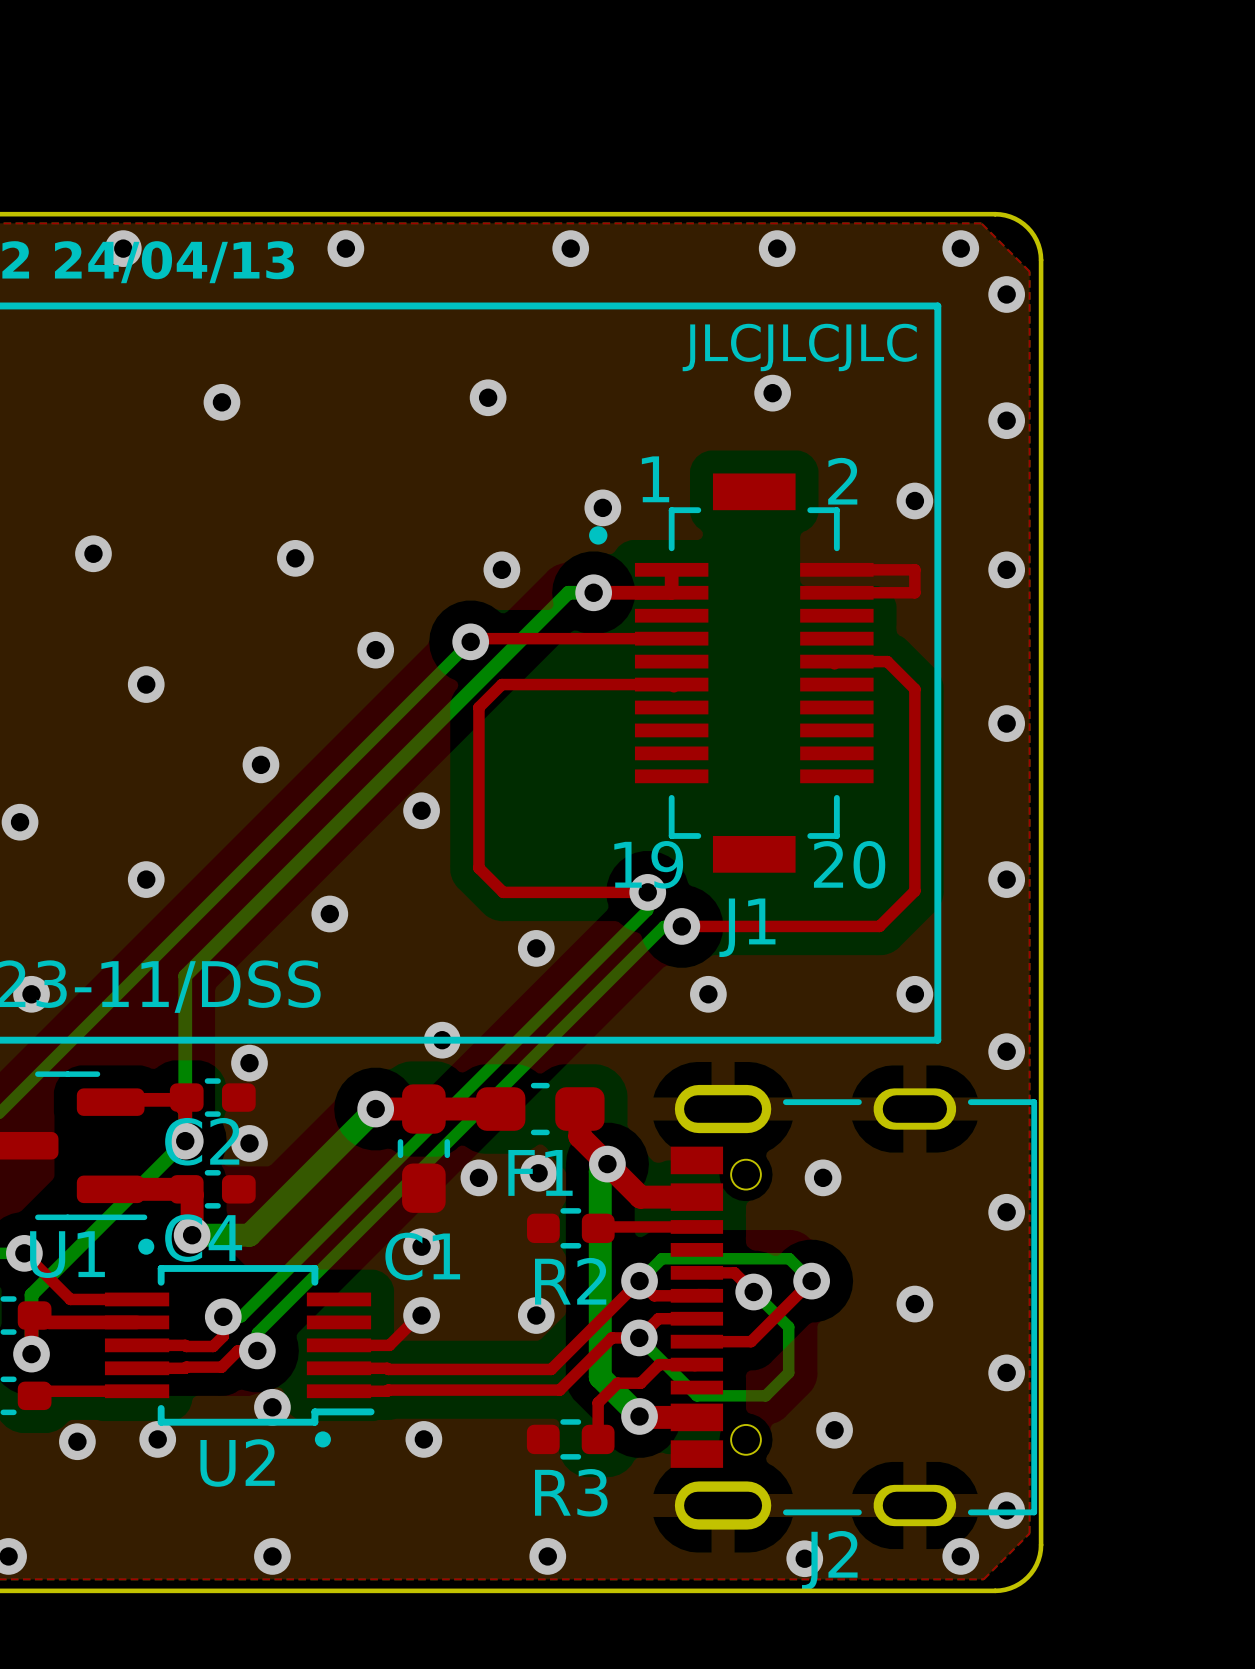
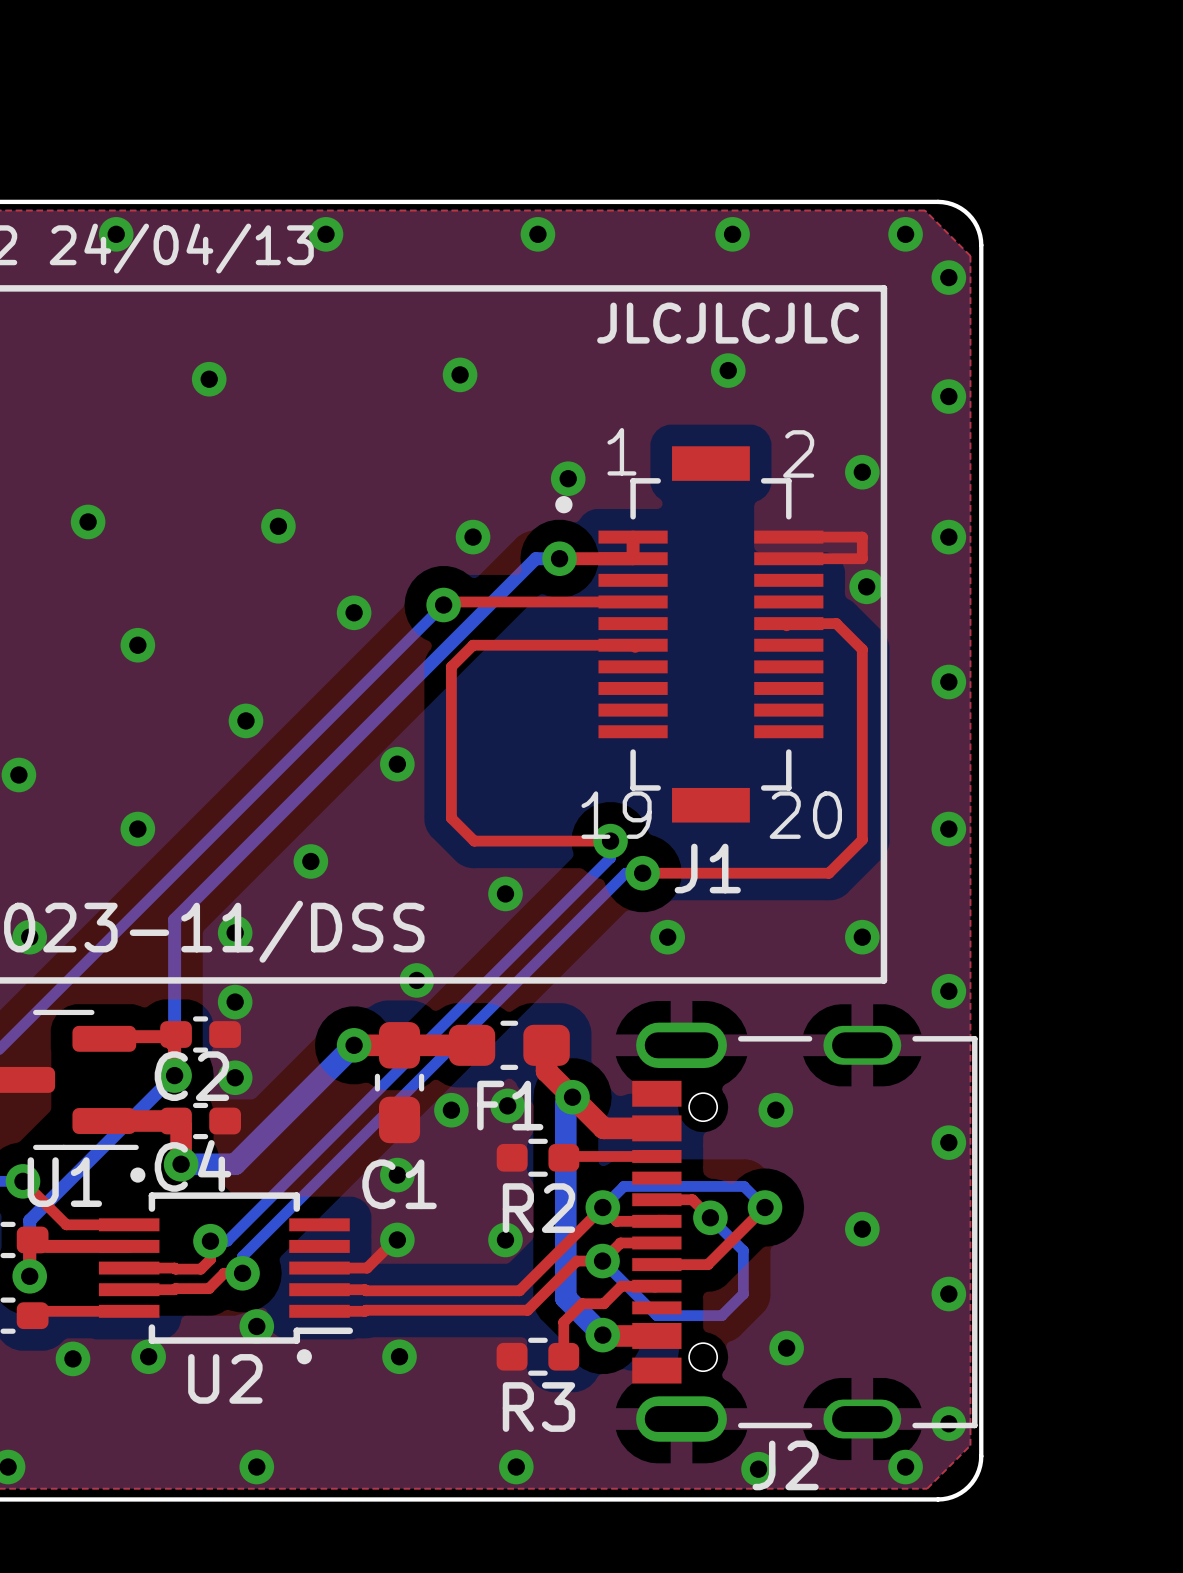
via: none -> (866, 586)
via: none -> (235, 932)

